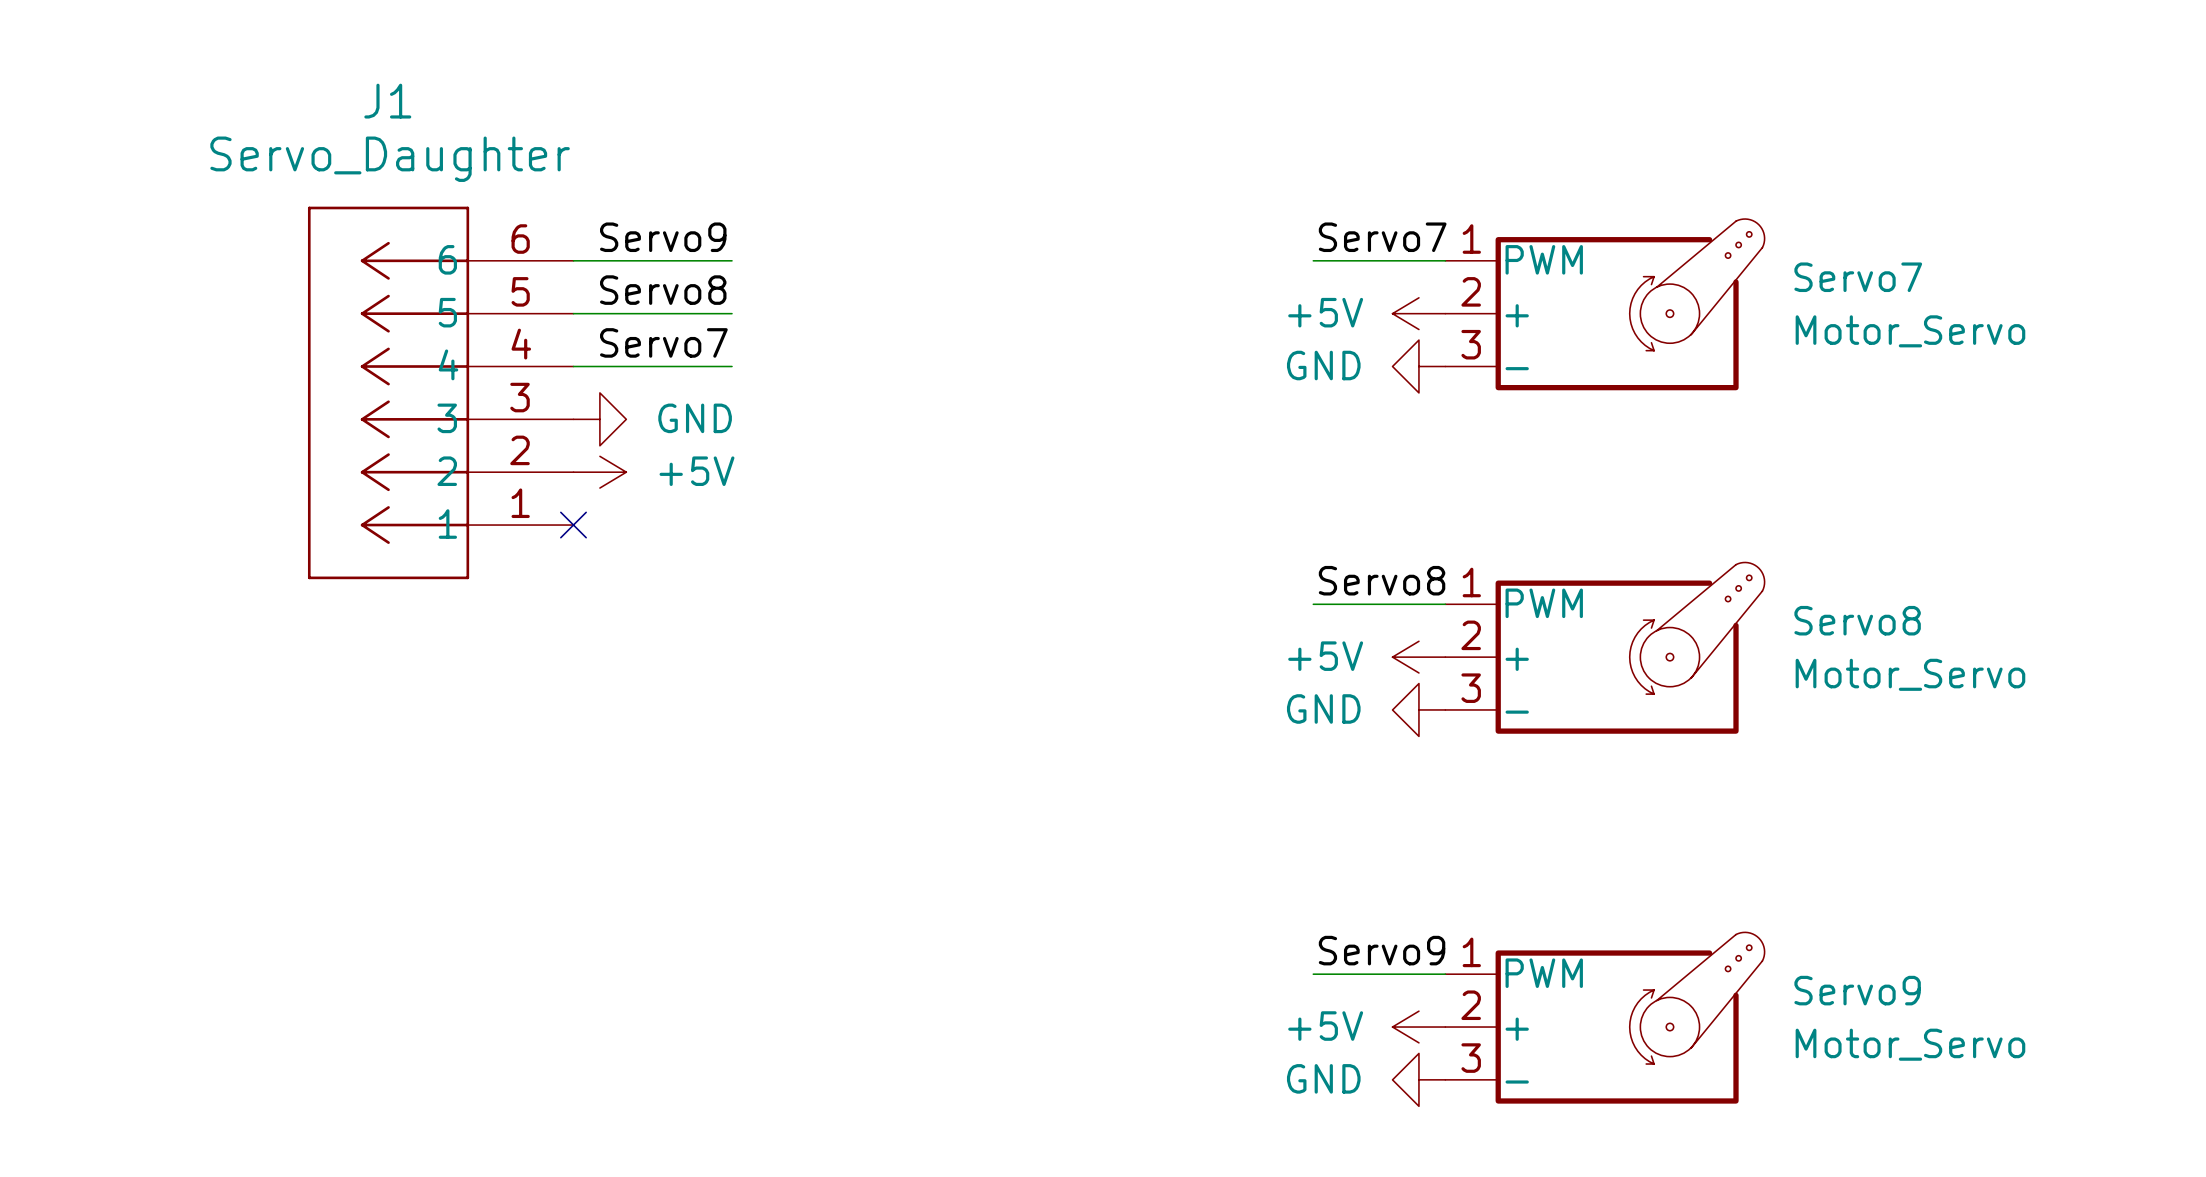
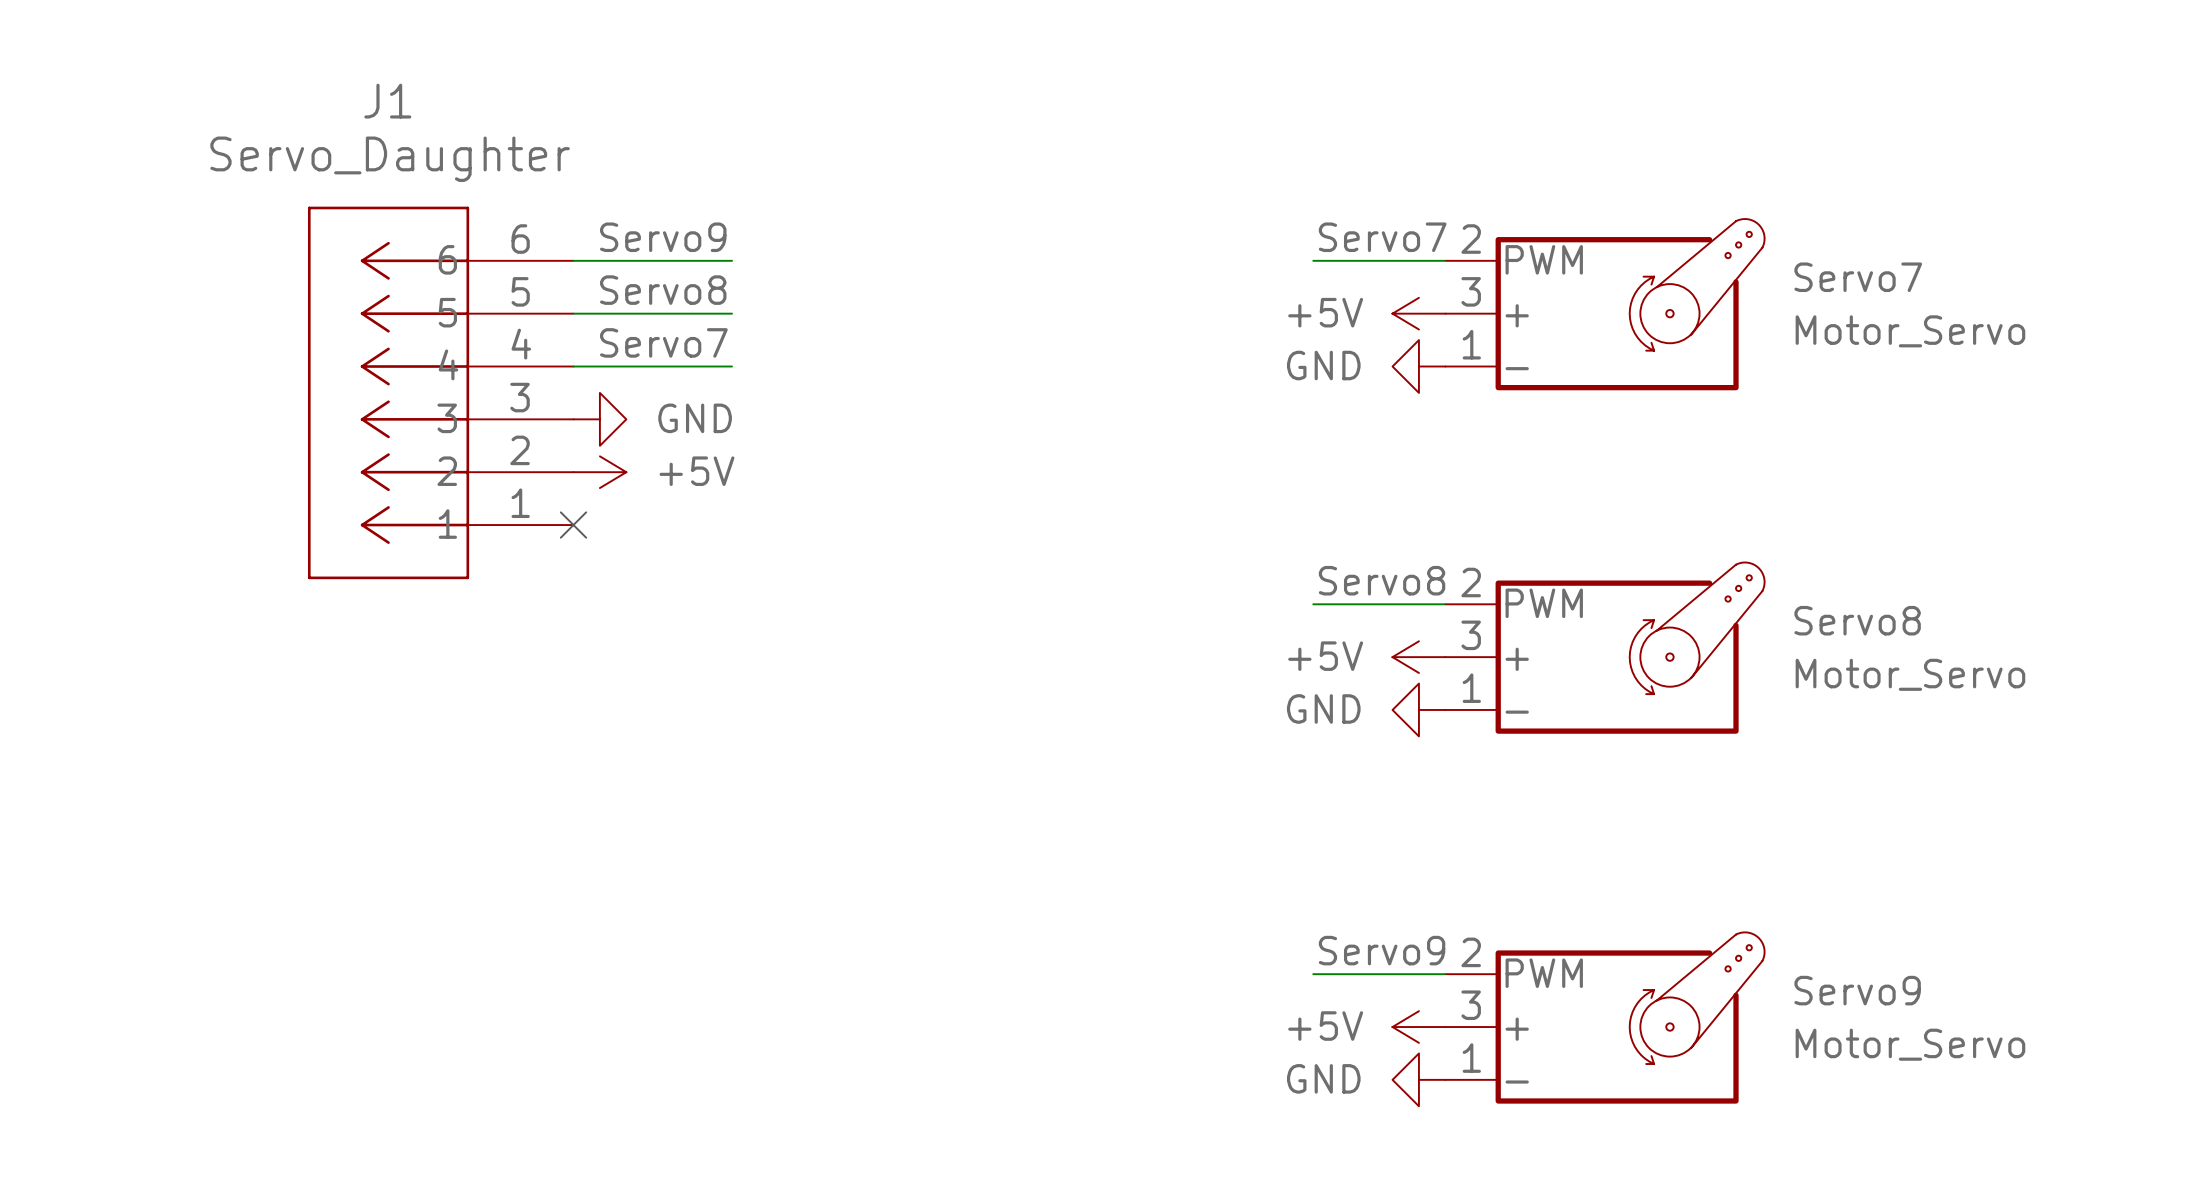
Servo7 pin number: 1 (1471, 239) -> 2 (1471, 239)
Servo7 pin number: 2 (1471, 291) -> 3 (1471, 291)
Servo7 pin number: 3 (1471, 344) -> 1 (1471, 344)
Servo8 pin number: 1 (1471, 582) -> 2 (1471, 582)
Servo8 pin number: 2 (1471, 635) -> 3 (1471, 635)
Servo8 pin number: 3 (1471, 688) -> 1 (1471, 688)
Servo9 pin number: 1 (1471, 952) -> 2 (1471, 952)
Servo9 pin number: 2 (1471, 1005) -> 3 (1471, 1005)
Servo9 pin number: 3 (1471, 1058) -> 1 (1471, 1058)

